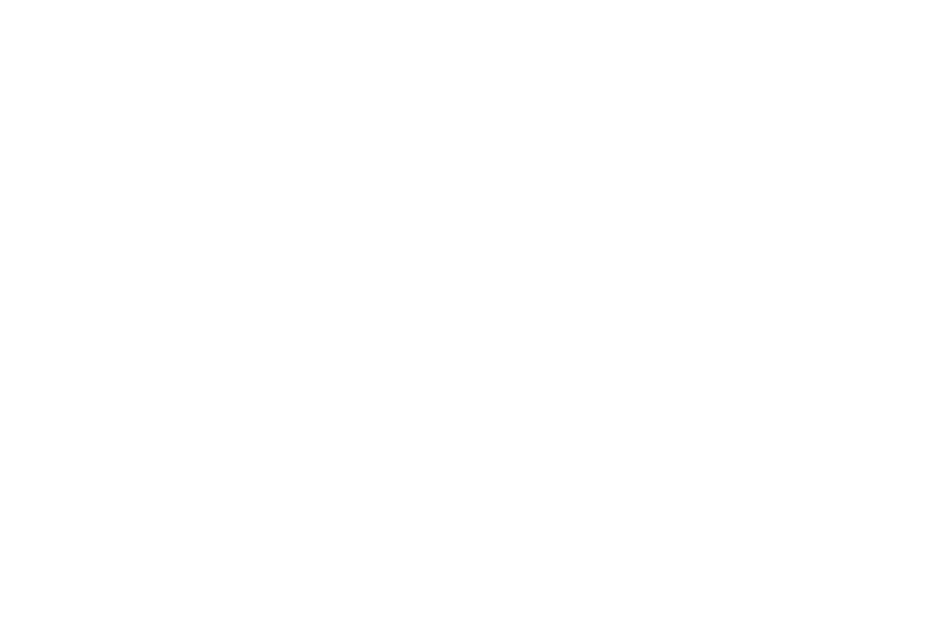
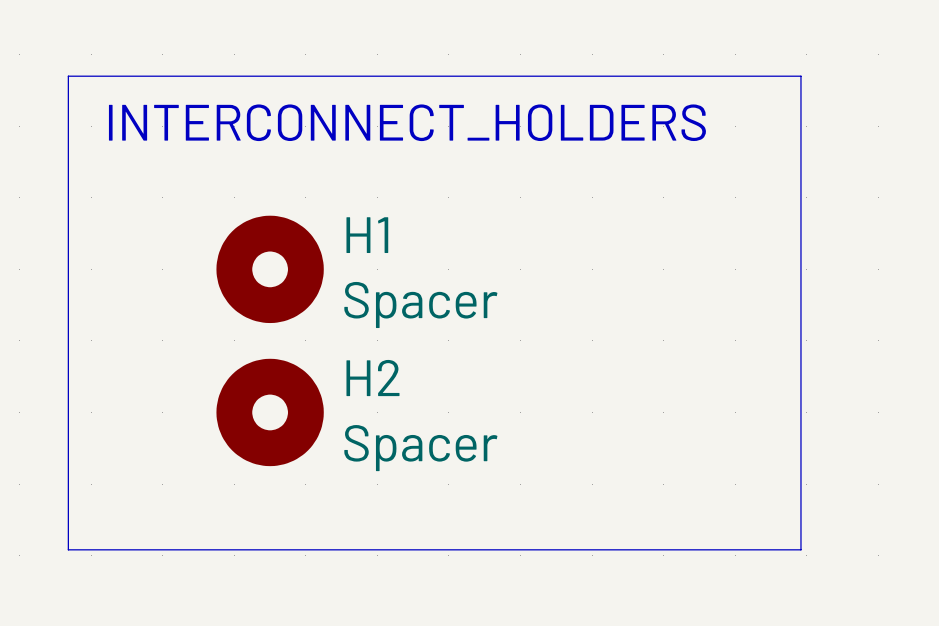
line: none -> (68, 76) (68, 549) (800, 549) (800, 76) (68, 76)
text: none -> INTERCONNECT_HOLDERS (407, 122)
H1: none -> Spacer (270, 269)
H2: none -> Spacer (270, 412)

